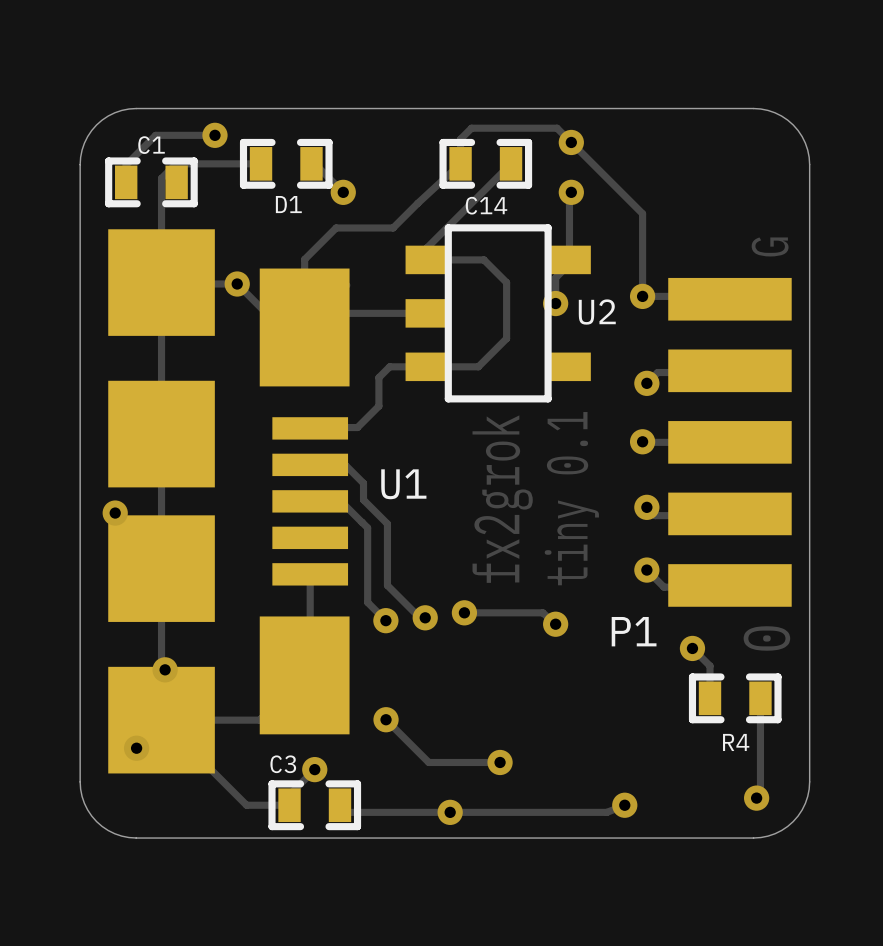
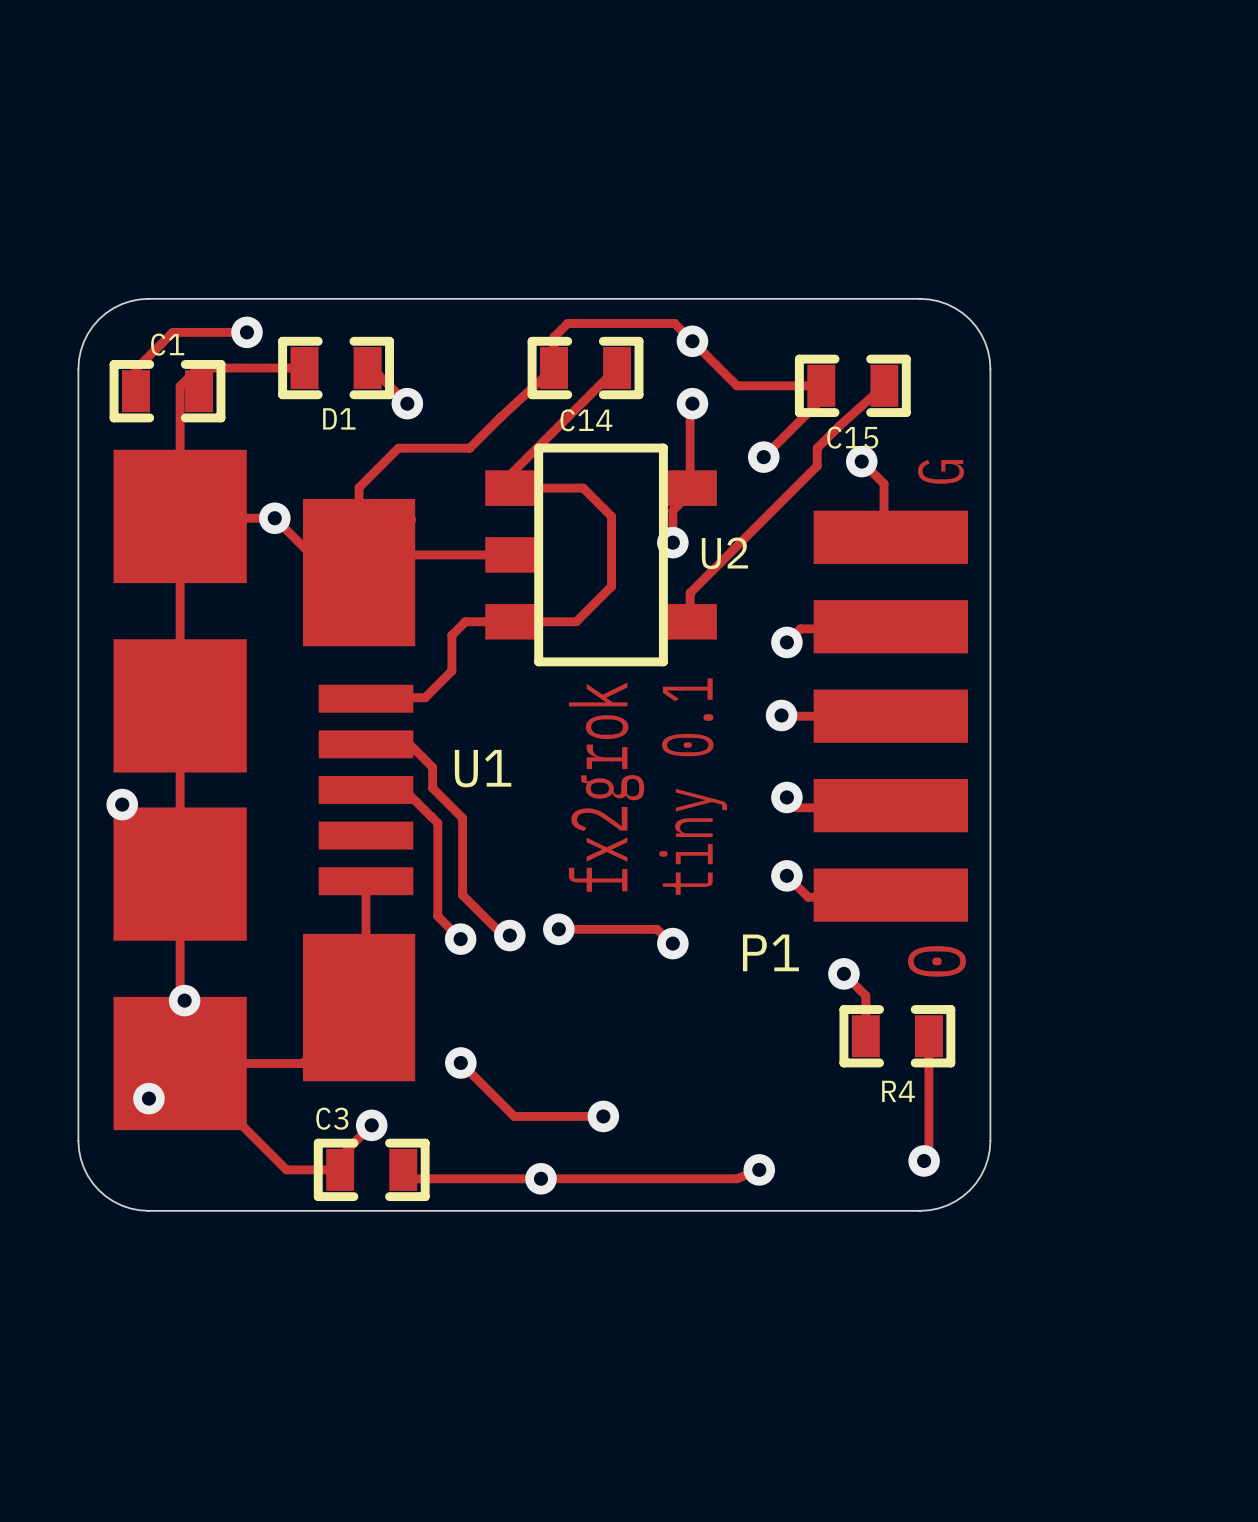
track: none -> (821, 381) (821, 399) (763, 457)
track: (606, 178) (642, 213) (642, 296) (727, 296) (729, 299) -> (737, 385) (821, 385)
C15: none -> (852, 385)
track: none -> (884, 385) (817, 448) (817, 466) (690, 593) (690, 621)
via: none -> (763, 457)
track: none -> (861, 461) (884, 483) (884, 520)
via: none -> (861, 461)
via: (642, 296) -> none

